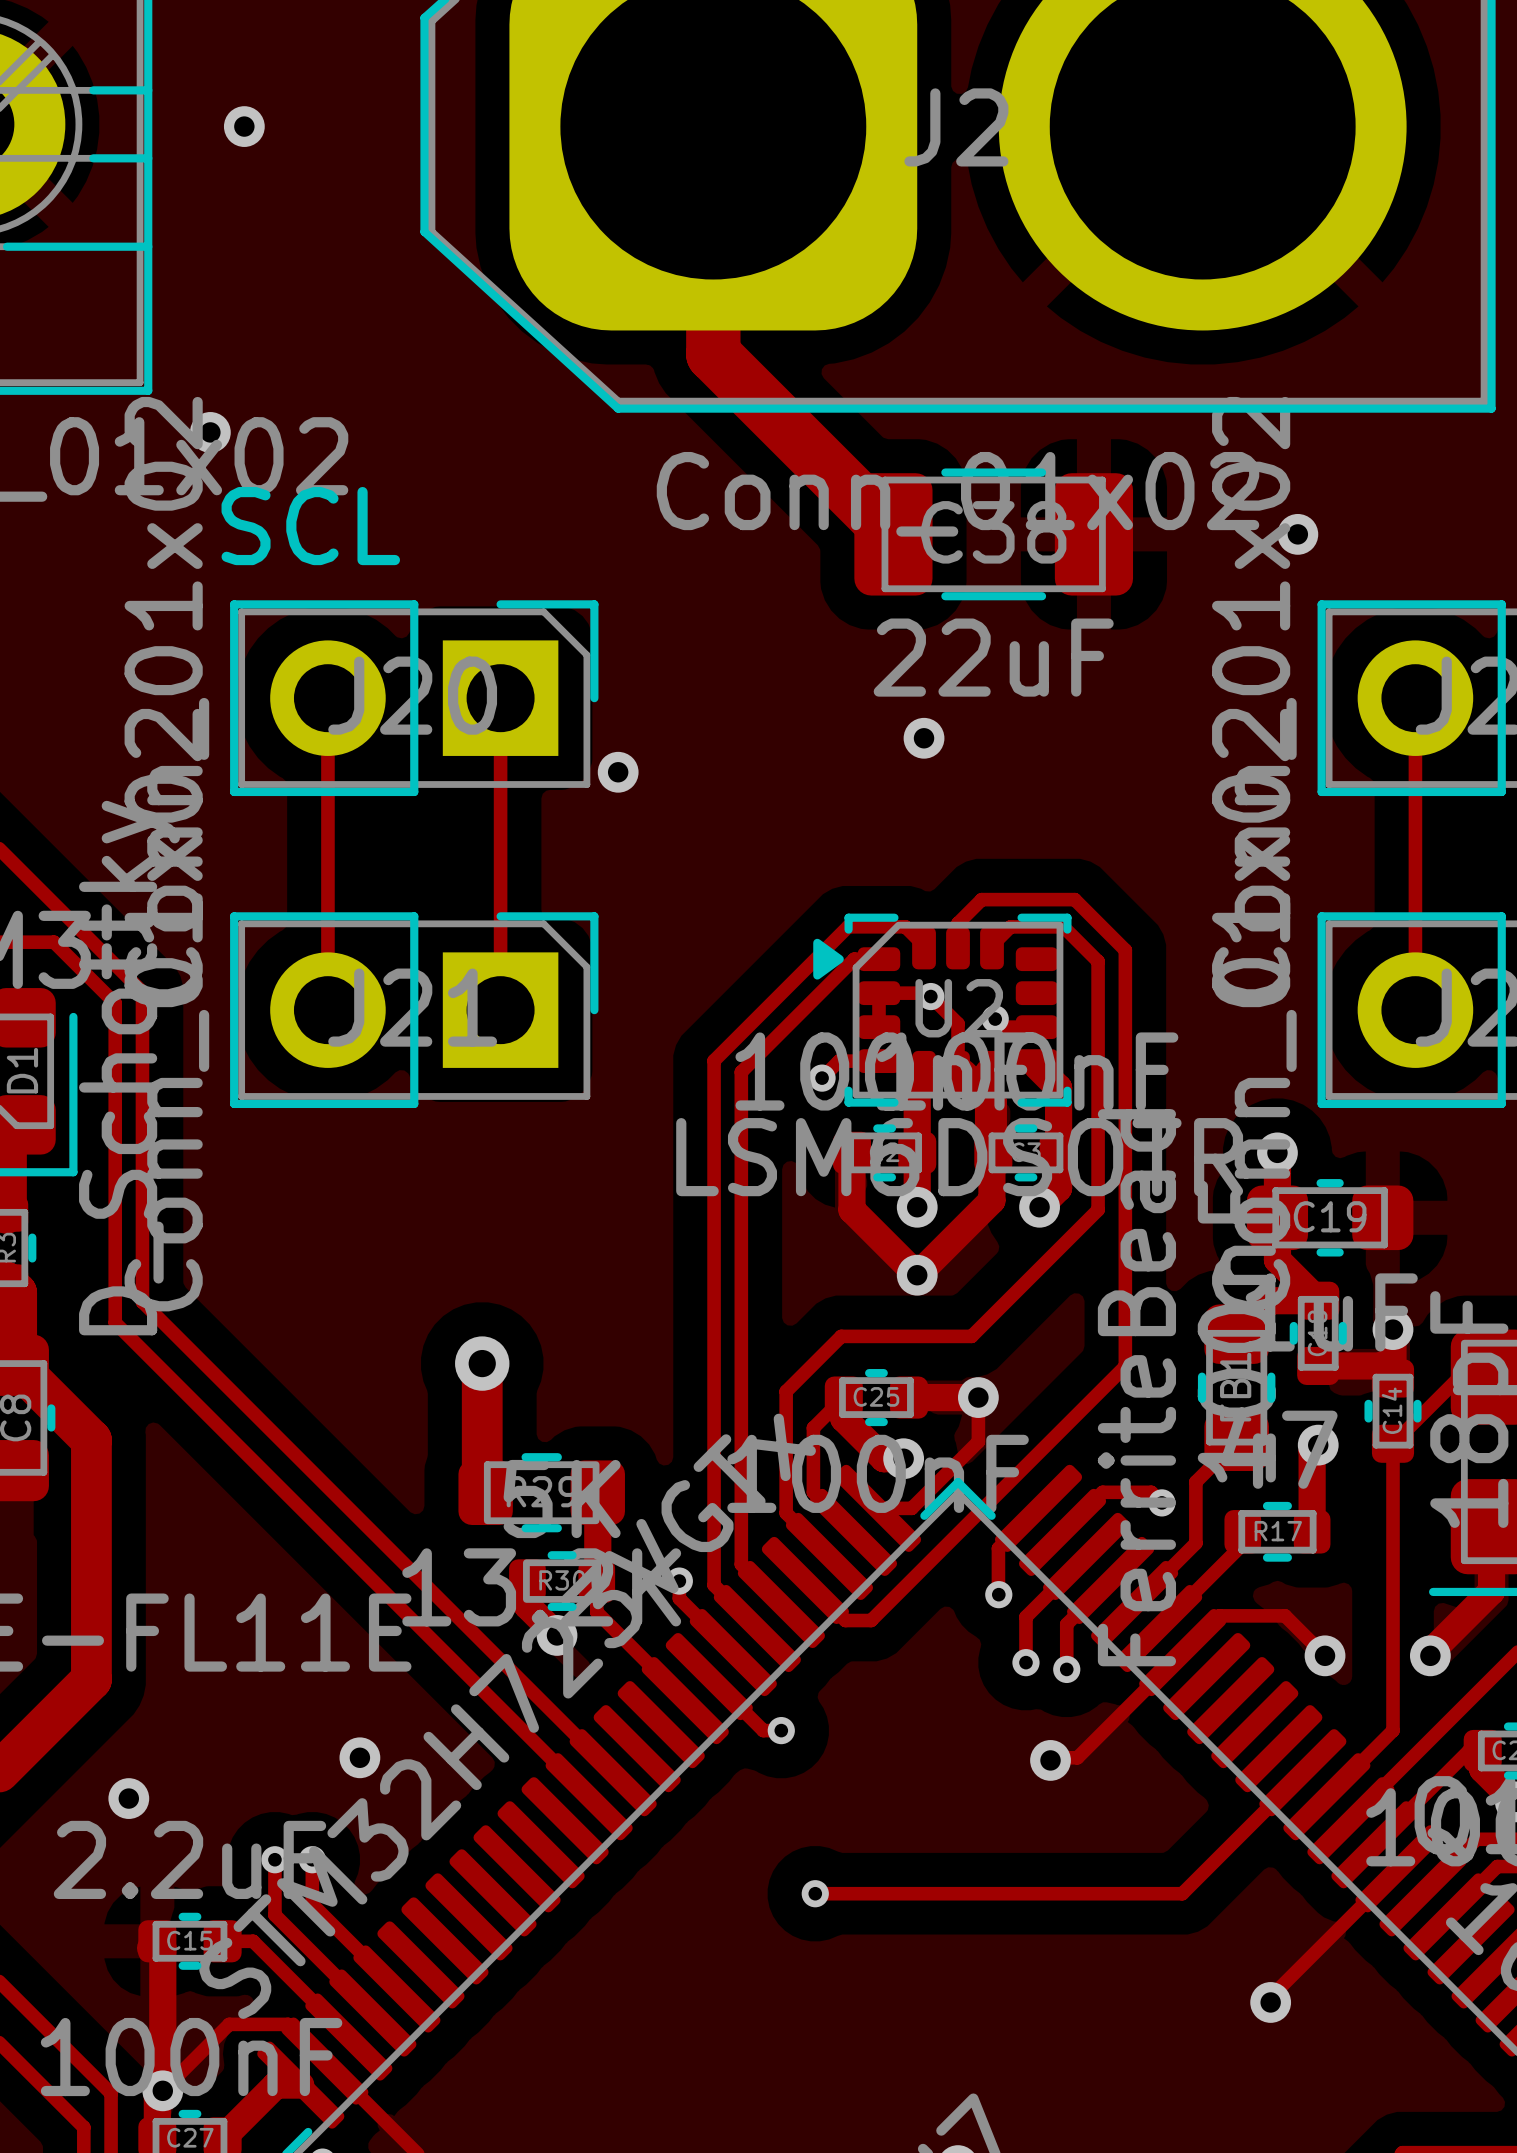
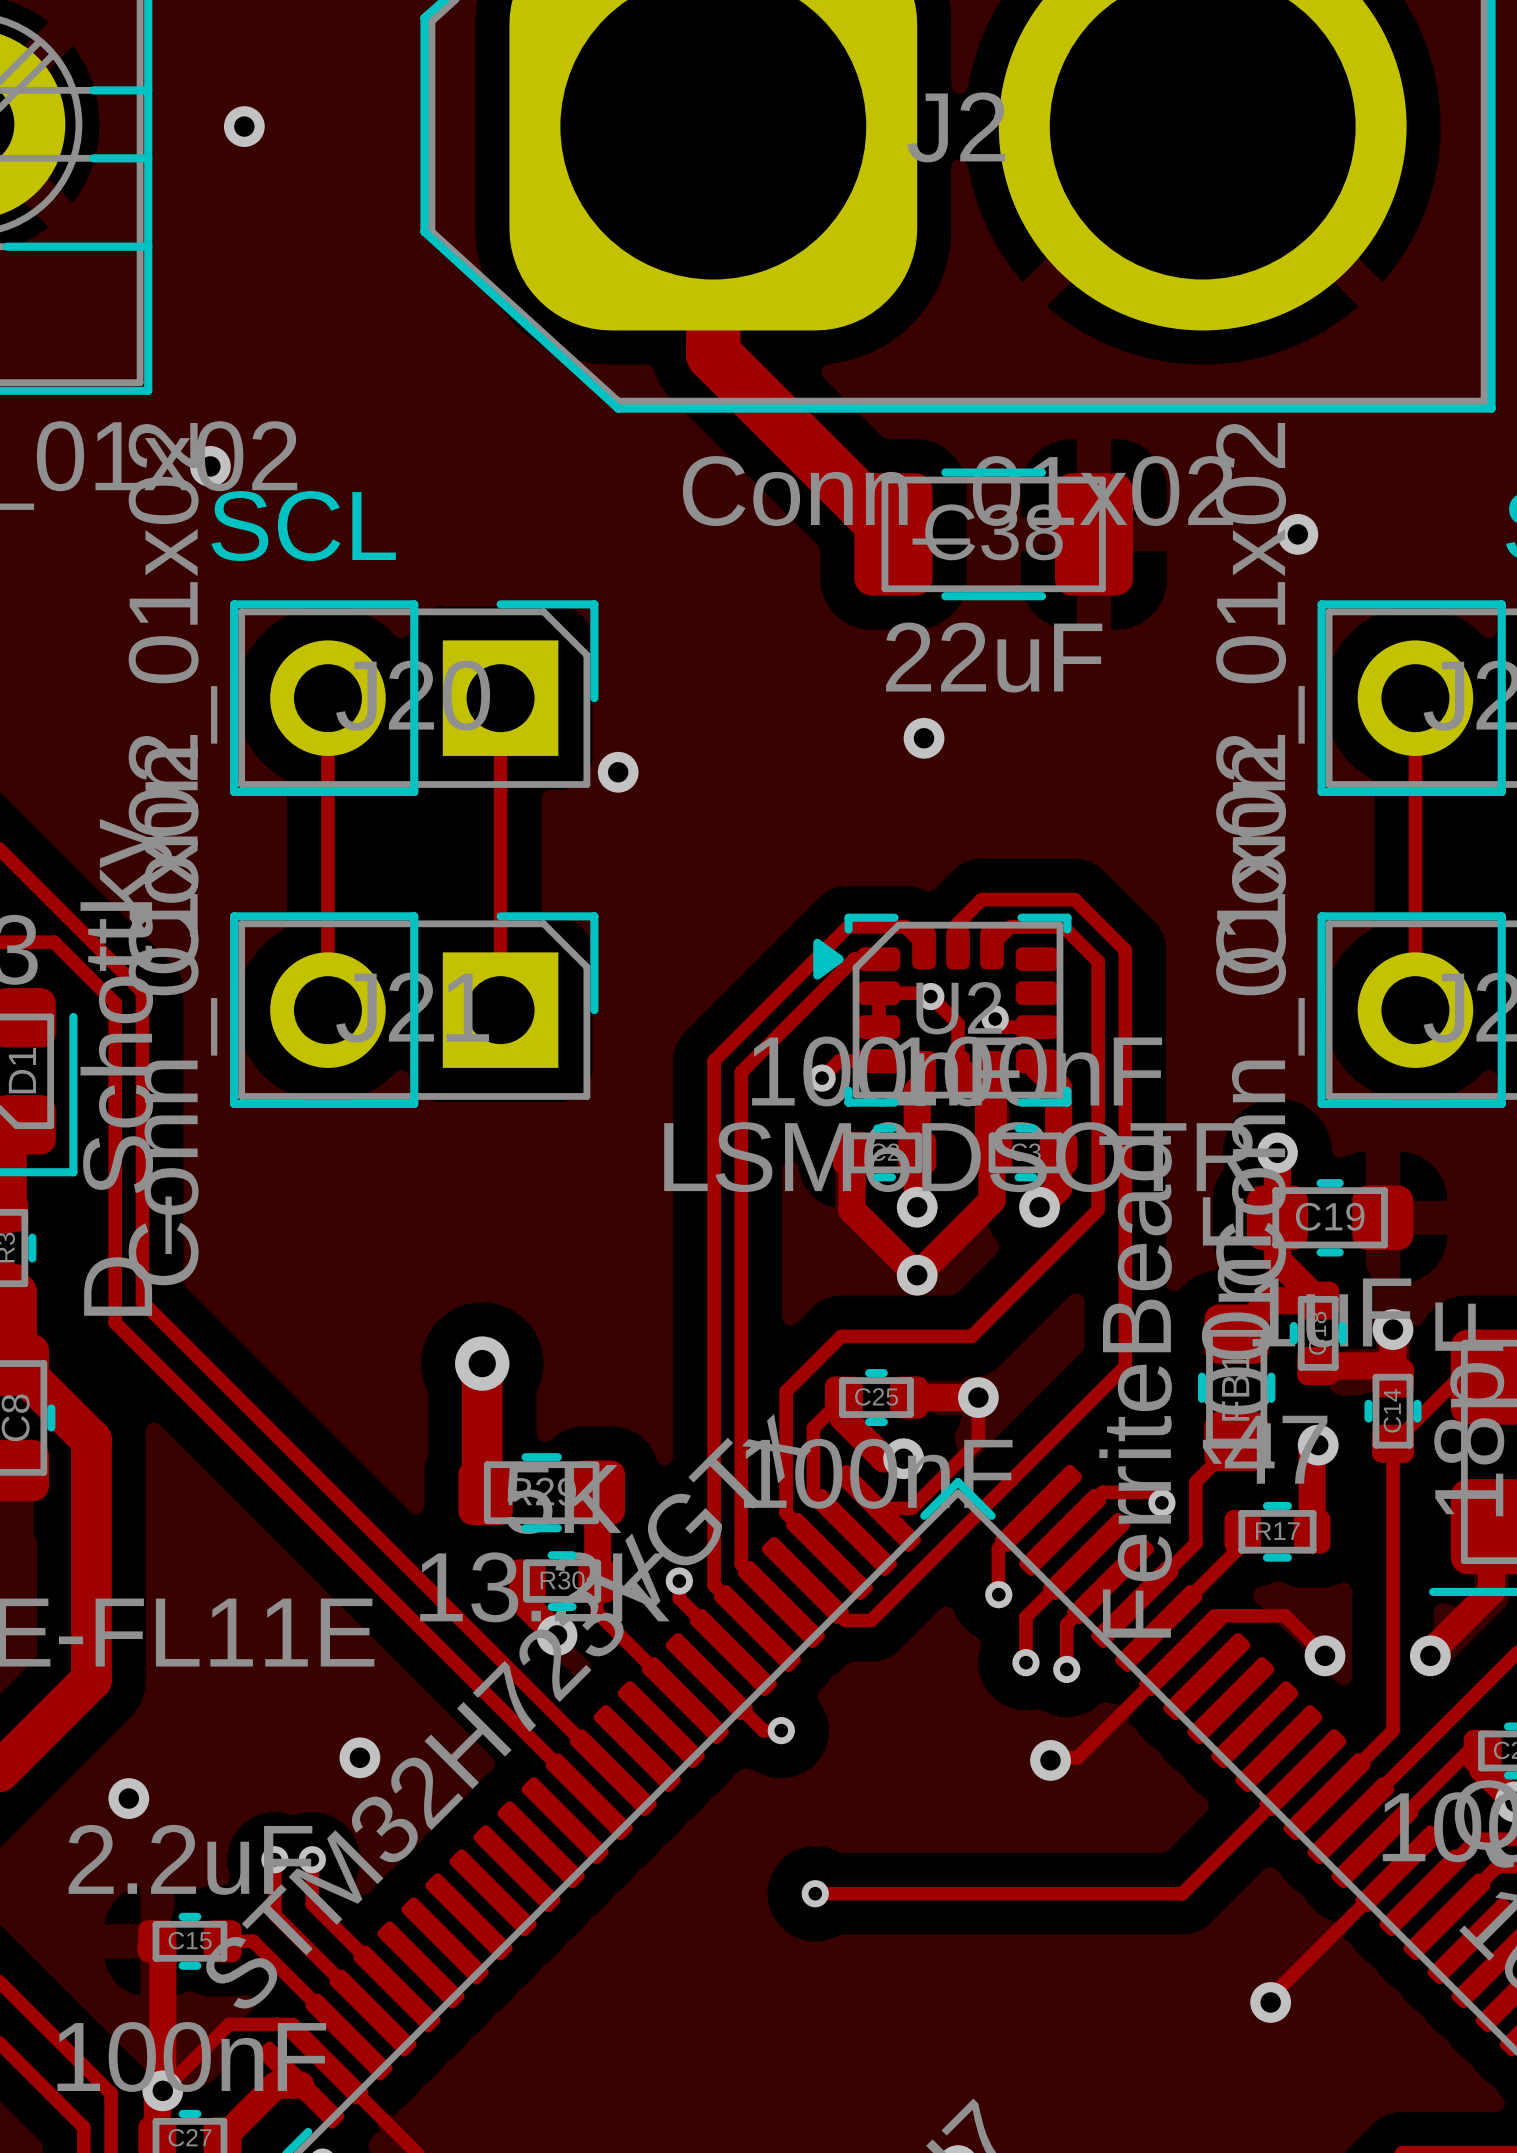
via position: (210, 432) -> (210, 466)

